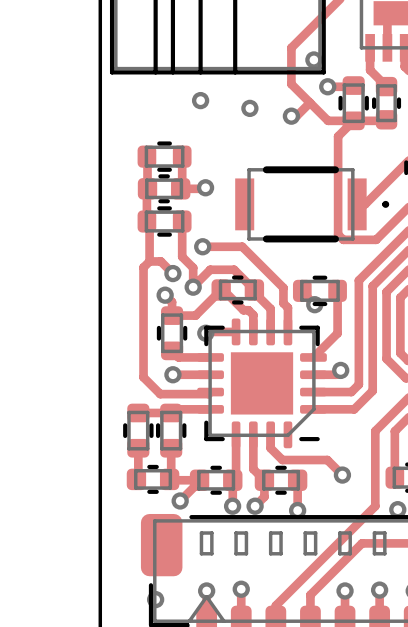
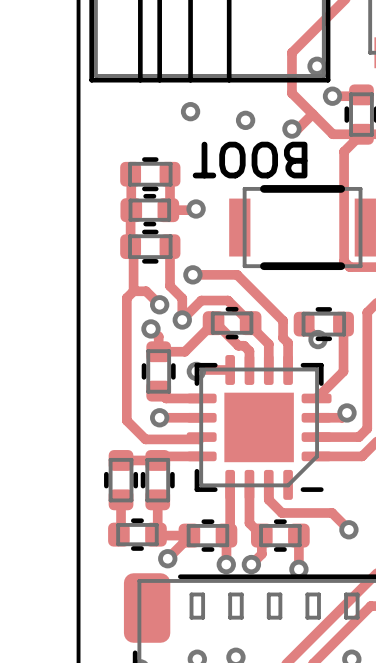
text: none -> BOOT (250, 160)

